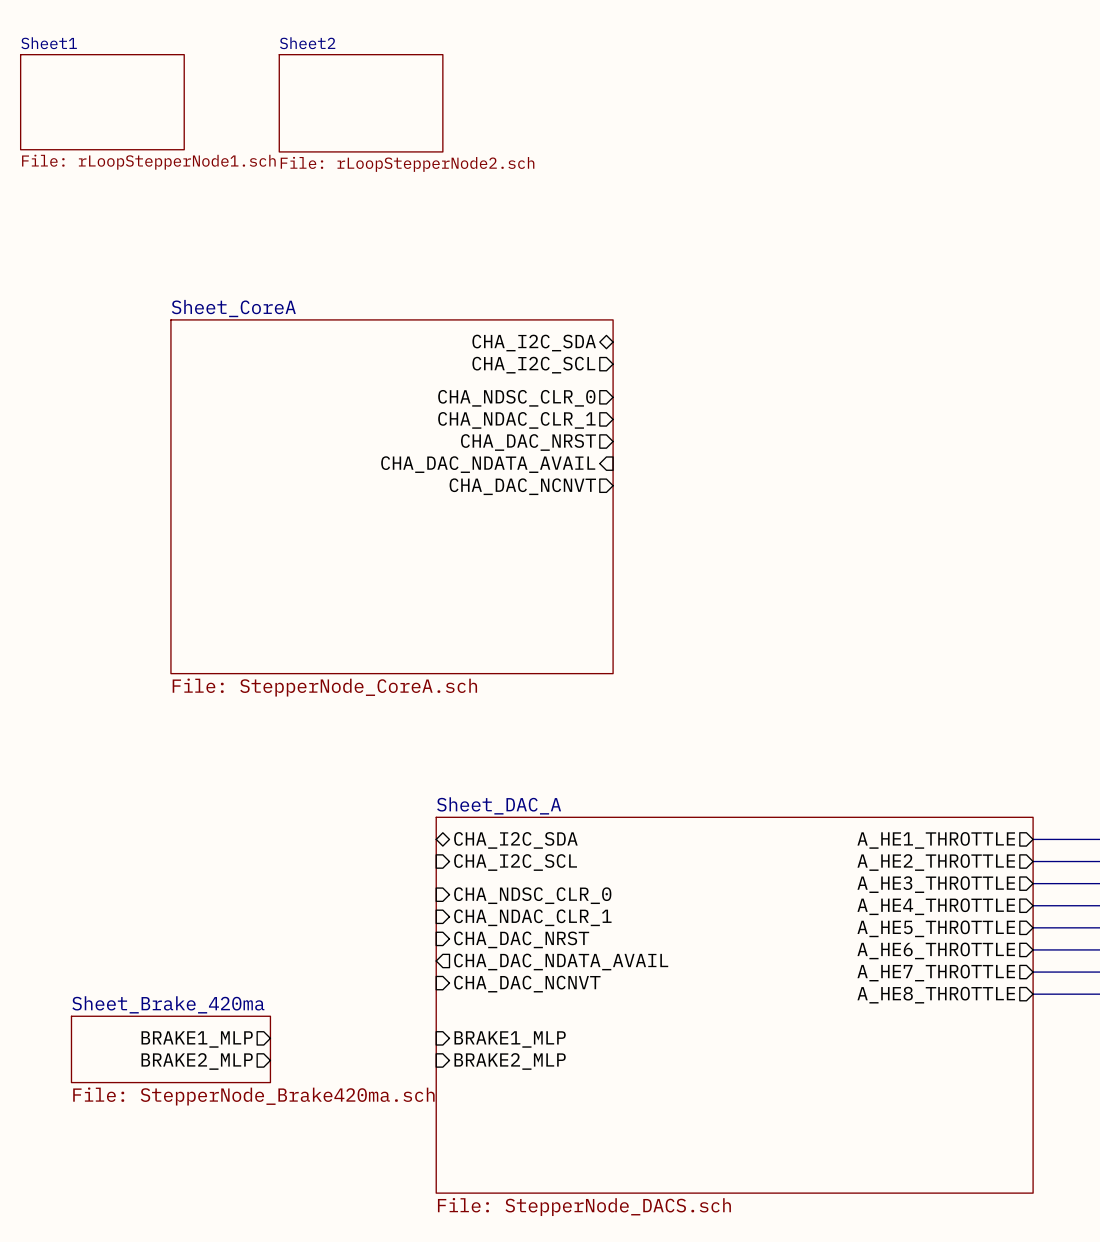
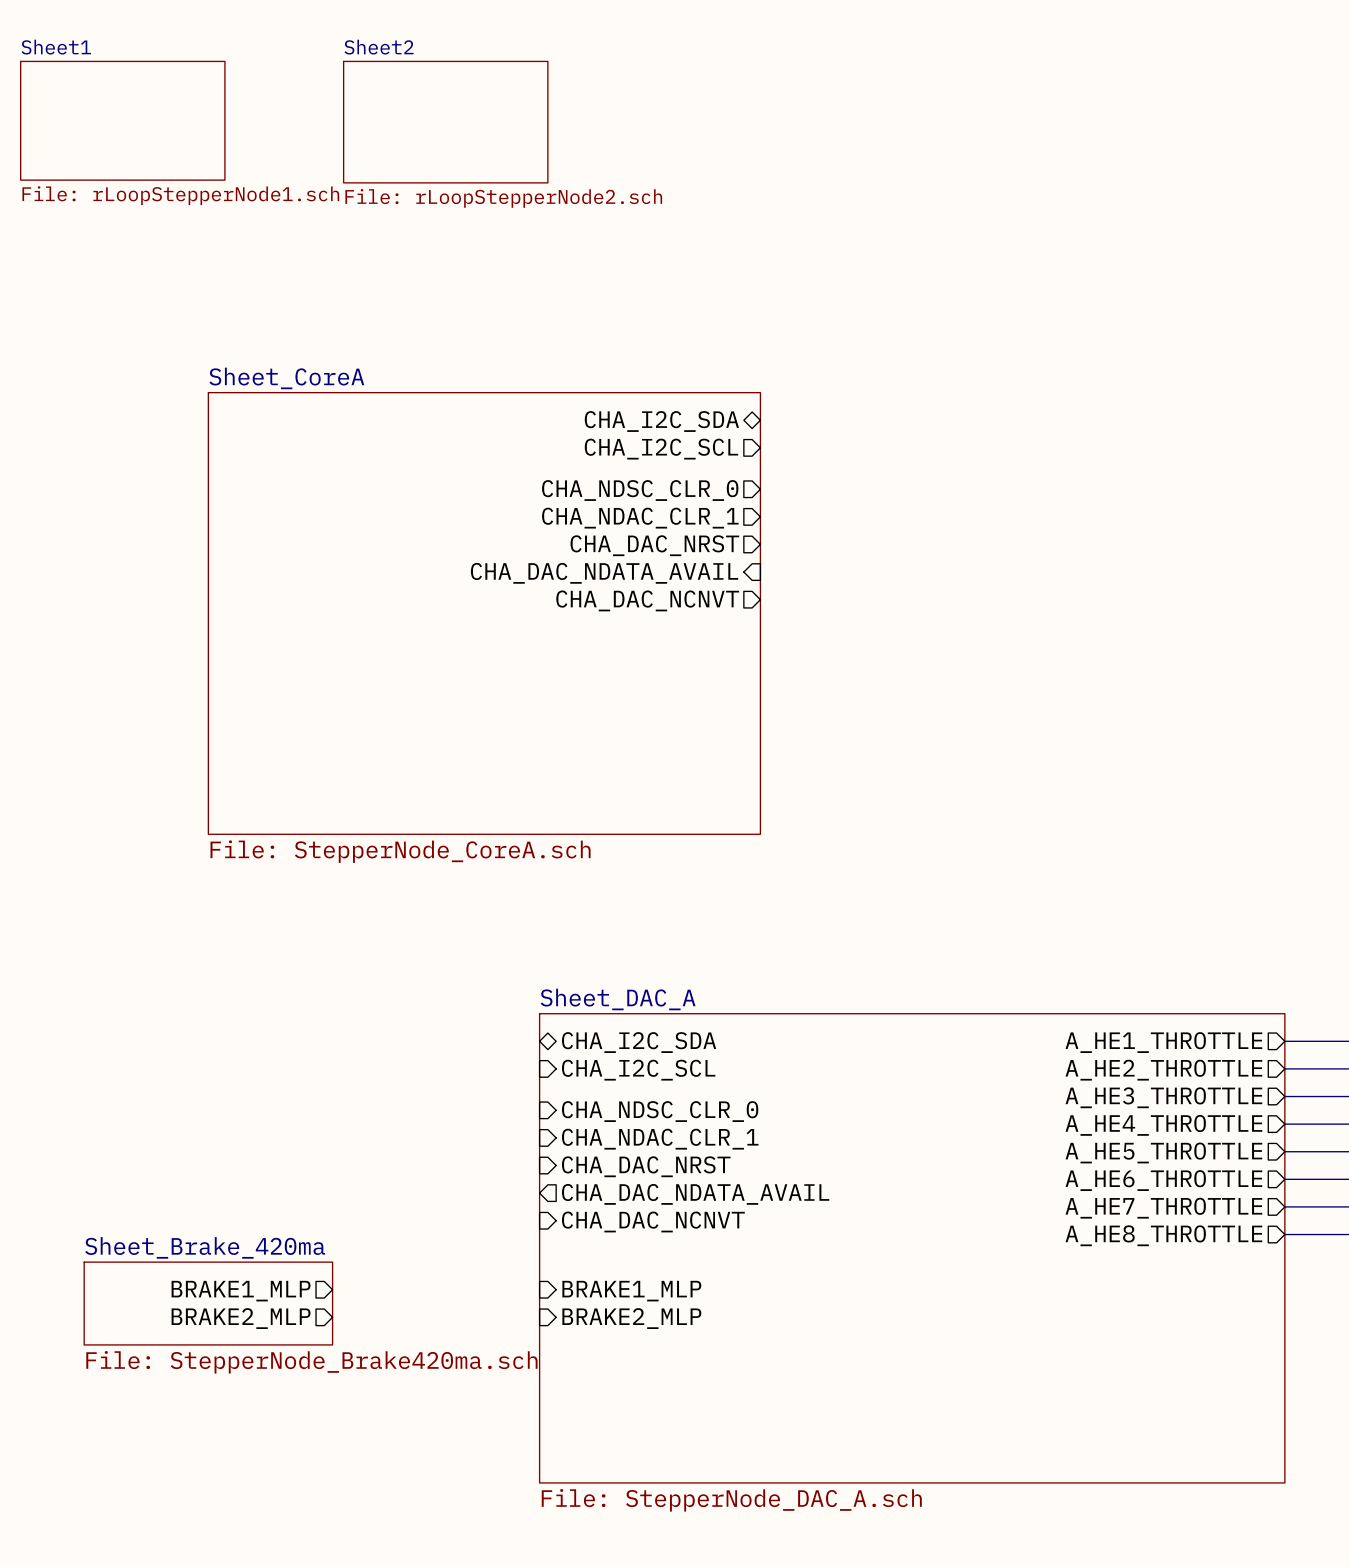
sheet Sheet_DAC_A value: File: StepperNode_DACS.sch (584, 1207) -> File: StepperNode_DAC_A.sch (731, 1500)

